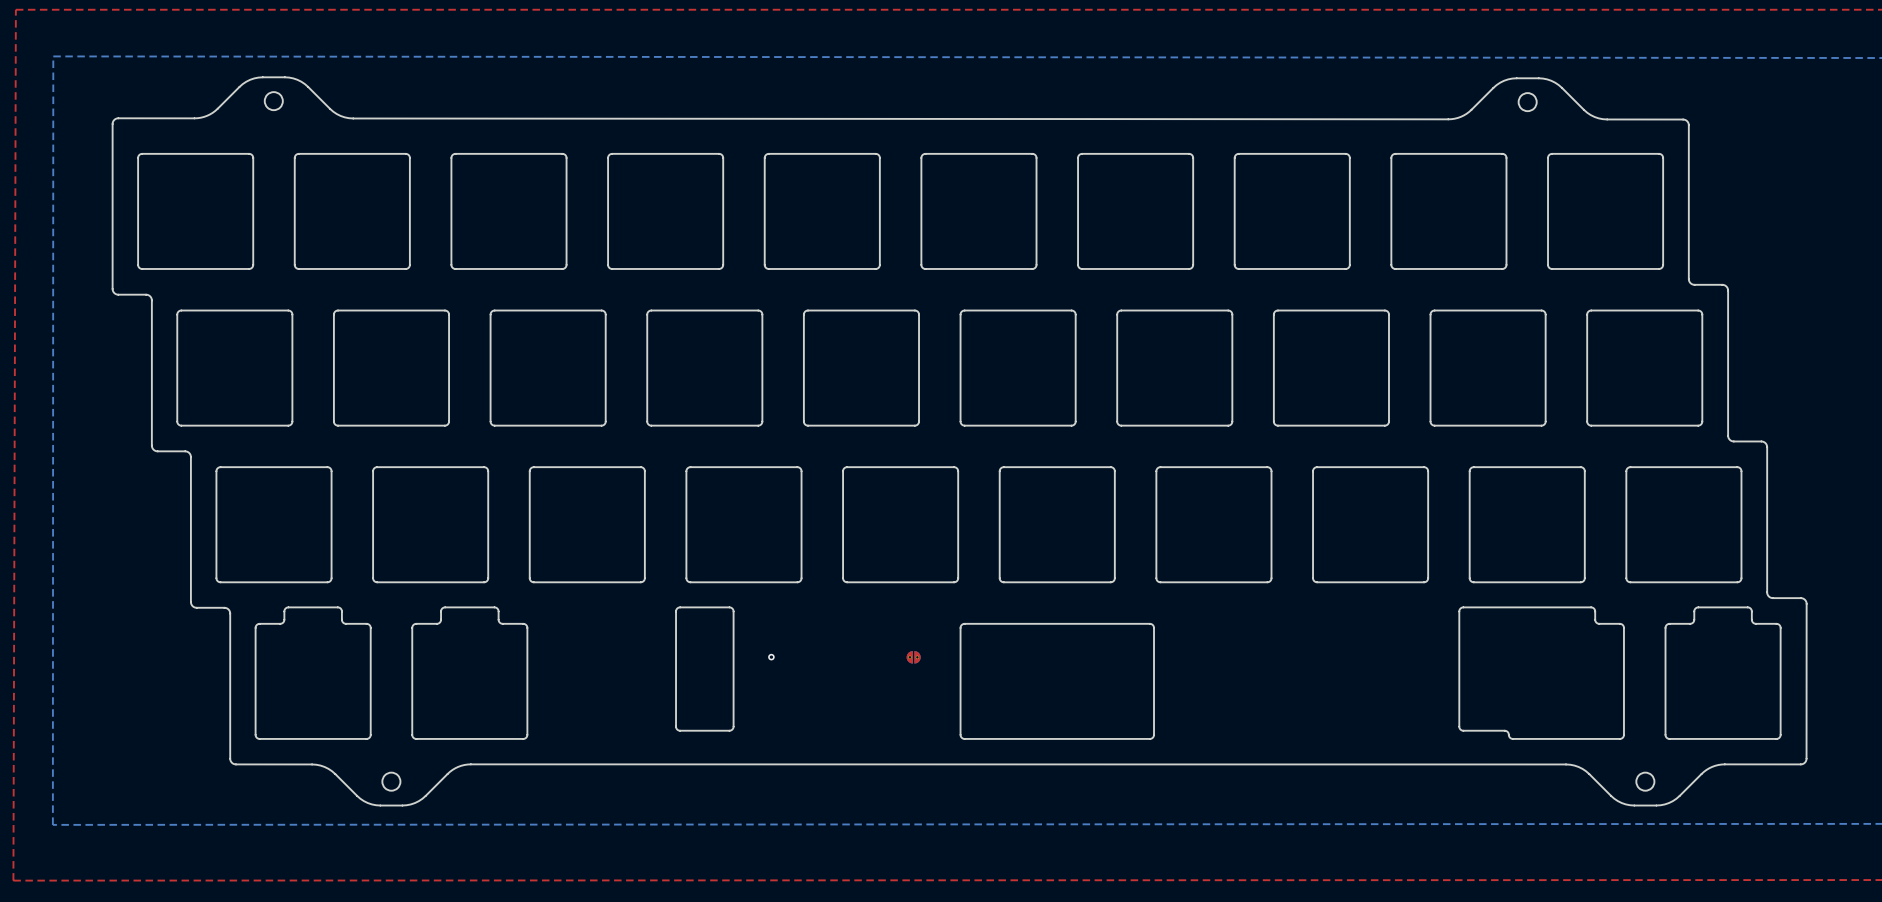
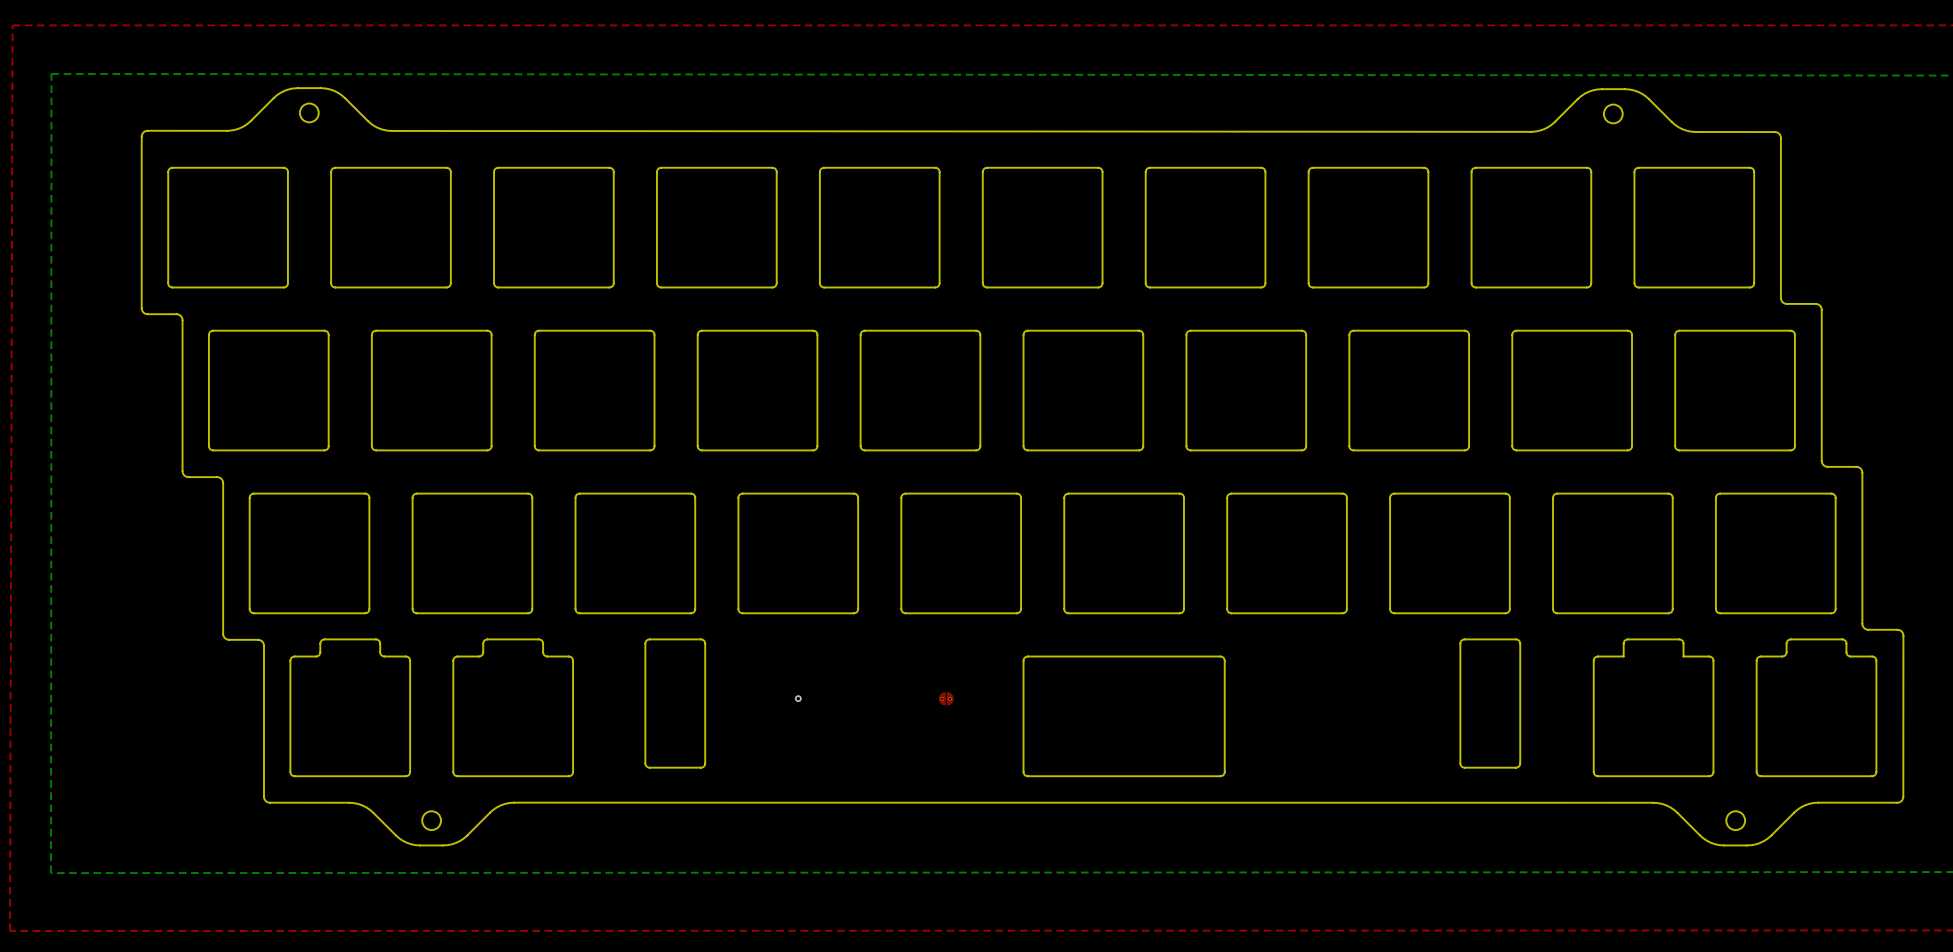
round board edge position: (273, 101) -> (309, 112)
round board edge position: (1527, 102) -> (1613, 113)
board edge: (142, 153) (252, 155) (252, 267) (139, 267) (138, 157) (142, 153) -> (172, 167) (286, 169) (286, 286) (169, 286) (168, 172) (172, 167)
board edge: (298, 153) (408, 155) (408, 267) (295, 267) (294, 157) (298, 153) -> (335, 167) (449, 169) (449, 286) (332, 286) (331, 172) (335, 167)
board edge: (455, 153) (565, 155) (565, 267) (452, 267) (451, 157) (455, 153) -> (498, 167) (612, 169) (612, 286) (495, 286) (494, 172) (498, 167)
board edge: (612, 153) (721, 155) (721, 267) (609, 267) (608, 157) (612, 153) -> (661, 167) (775, 169) (775, 286) (658, 286) (656, 172) (661, 167)
board edge: (768, 153) (878, 155) (878, 267) (765, 267) (764, 157) (768, 153) -> (824, 167) (938, 169) (938, 286) (821, 286) (819, 172) (824, 167)
board edge: (925, 153) (1035, 155) (1035, 267) (922, 267) (921, 157) (925, 153) -> (987, 167) (1101, 169) (1101, 286) (984, 286) (982, 172) (987, 167)
board edge: (1082, 153) (1191, 155) (1191, 267) (1079, 267) (1078, 157) (1082, 153) -> (1149, 167) (1264, 169) (1264, 286) (1146, 286) (1145, 172) (1149, 167)
board edge: (1238, 153) (1348, 155) (1348, 267) (1235, 267) (1234, 157) (1238, 153) -> (1312, 167) (1427, 169) (1427, 286) (1309, 286) (1308, 172) (1312, 167)
board edge: (1395, 153) (1505, 155) (1505, 267) (1392, 267) (1391, 157) (1395, 153) -> (1475, 167) (1590, 169) (1590, 286) (1472, 286) (1471, 172) (1475, 167)
board edge: (1552, 153) (1661, 155) (1661, 267) (1549, 267) (1548, 157) (1552, 153) -> (1638, 167) (1752, 169) (1752, 286) (1635, 286) (1634, 172) (1638, 167)
board edge: (181, 310) (291, 311) (291, 424) (178, 424) (177, 314) (181, 310) -> (213, 330) (327, 331) (327, 449) (210, 449) (208, 334) (213, 330)
board edge: (338, 310) (447, 311) (447, 424) (335, 424) (333, 314) (338, 310) -> (376, 330) (490, 331) (490, 449) (373, 449) (371, 334) (376, 330)
board edge: (494, 310) (604, 311) (604, 424) (491, 424) (490, 314) (494, 310) -> (539, 330) (653, 331) (653, 449) (536, 449) (534, 334) (539, 330)
board edge: (651, 310) (761, 311) (761, 424) (648, 424) (647, 314) (651, 310) -> (701, 330) (816, 331) (816, 449) (698, 449) (697, 334) (701, 330)
board edge: (808, 310) (917, 311) (917, 424) (805, 424) (803, 314) (808, 310) -> (864, 330) (979, 331) (979, 449) (861, 449) (860, 334) (864, 330)
board edge: (964, 310) (1074, 311) (1074, 424) (961, 424) (960, 314) (964, 310) -> (1027, 330) (1142, 331) (1142, 449) (1024, 449) (1023, 334) (1027, 330)
board edge: (1121, 310) (1231, 311) (1231, 424) (1118, 424) (1117, 314) (1121, 310) -> (1190, 330) (1304, 331) (1304, 449) (1187, 449) (1186, 334) (1190, 330)
board edge: (1277, 310) (1387, 311) (1387, 424) (1275, 424) (1273, 314) (1277, 310) -> (1353, 330) (1467, 331) (1467, 449) (1350, 449) (1349, 334) (1353, 330)
board edge: (1434, 310) (1544, 311) (1544, 424) (1431, 424) (1430, 314) (1434, 310) -> (1516, 330) (1630, 331) (1630, 449) (1513, 449) (1512, 334) (1516, 330)
board edge: (1591, 310) (1701, 311) (1701, 424) (1588, 424) (1587, 314) (1591, 310) -> (1679, 330) (1793, 331) (1793, 449) (1676, 449) (1675, 334) (1679, 330)
board edge: (185, 451) (189, 453) (190, 457) (191, 603) (195, 607) (225, 607) (230, 612) (230, 761) (235, 764) (320, 765) (332, 771) (360, 798) (376, 805) (402, 805) (415, 803) (425, 795) (452, 769) (470, 764) (1566, 764) (1574, 765) (1586, 771) (1611, 795) (1621, 803) (1630, 805) (1656, 805) (1669, 803) (1676, 798) (1703, 771) (1715, 765) (1801, 764) (1806, 759) (1806, 602) (1802, 598) (1772, 598) (1767, 594) (1766, 445) (1762, 441) (1732, 441) (1728, 436) (1727, 289) (1723, 284) (1693, 284) (1689, 280) (1688, 123) (1683, 119) (1598, 118) (1587, 112) (1558, 85) (1543, 78) (1516, 78) (1504, 80) (1493, 87) (1466, 113) (1448, 119) (353, 118) (344, 117) (333, 111) (308, 86) (297, 79) (284, 77) (254, 78) (242, 84) (215, 110) (204, 116) (117, 118) (112, 122) (112, 290) (116, 294) (146, 294) (151, 298) (152, 447) (156, 451) (185, 451) -> (297, 88) (284, 90) (277, 95) (248, 123) (236, 129) (147, 130) (143, 133) (141, 136) (141, 309) (146, 314) (177, 314) (182, 318) (182, 471) (186, 476) (217, 477) (222, 481) (223, 634) (227, 639) (258, 639) (263, 644) (264, 796) (267, 802) (357, 803) (369, 809) (403, 840) (420, 845) (447, 845) (456, 842) (467, 835) (495, 808) (514, 802) (1653, 802) (1662, 803) (1674, 809) (1700, 835) (1711, 842) (1719, 845) (1747, 845) (1760, 842) (1768, 838) (1796, 810) (1808, 804) (1897, 802) (1902, 799) (1903, 634) (1898, 629) (1867, 629) (1862, 625) (1862, 472) (1857, 467) (1826, 466) (1821, 462) (1821, 307) (1816, 304) (1785, 303) (1781, 299) (1780, 138) (1777, 132) (1687, 130) (1675, 124) (1645, 96) (1637, 91) (1624, 89) (1597, 89) (1588, 91) (1577, 99) (1549, 126) (1530, 131) (391, 130) (383, 129) (371, 123) (345, 98) (333, 90) (325, 88) (297, 88)
board edge: (220, 467) (330, 468) (330, 581) (217, 581) (216, 471) (220, 467) -> (253, 493) (368, 494) (368, 612) (250, 612) (249, 497) (253, 493)
board edge: (377, 467) (487, 468) (487, 581) (374, 581) (373, 471) (377, 467) -> (416, 493) (531, 494) (531, 612) (413, 612) (412, 497) (416, 493)
board edge: (533, 467) (643, 468) (643, 581) (530, 581) (529, 471) (533, 467) -> (579, 493) (693, 494) (693, 612) (576, 612) (575, 497) (579, 493)
board edge: (690, 467) (800, 468) (800, 581) (687, 581) (686, 471) (690, 467) -> (742, 493) (856, 494) (856, 612) (739, 612) (738, 497) (742, 493)
board edge: (847, 467) (956, 468) (956, 581) (844, 581) (843, 471) (847, 467) -> (905, 493) (1019, 494) (1019, 612) (902, 612) (901, 497) (905, 493)
board edge: (1003, 467) (1113, 468) (1113, 581) (1000, 581) (999, 471) (1003, 467) -> (1068, 493) (1182, 494) (1182, 612) (1065, 612) (1064, 497) (1068, 493)
board edge: (1160, 467) (1270, 468) (1270, 581) (1157, 581) (1156, 471) (1160, 467) -> (1231, 493) (1345, 494) (1345, 612) (1228, 612) (1227, 497) (1231, 493)
board edge: (1317, 467) (1426, 468) (1426, 581) (1314, 581) (1313, 471) (1317, 467) -> (1394, 493) (1508, 494) (1508, 612) (1391, 612) (1390, 497) (1394, 493)
board edge: (1473, 467) (1583, 468) (1583, 581) (1470, 581) (1469, 471) (1473, 467) -> (1557, 493) (1671, 494) (1671, 612) (1554, 612) (1553, 497) (1557, 493)
board edge: (1630, 467) (1740, 468) (1740, 581) (1627, 581) (1626, 471) (1630, 467) -> (1720, 493) (1834, 494) (1834, 612) (1717, 612) (1715, 497) (1720, 493)
board edge: none -> (324, 639) (377, 639) (380, 642) (380, 652) (382, 655) (406, 656) (409, 658) (410, 771) (407, 775) (294, 776) (290, 774) (290, 659) (294, 656) (318, 655) (320, 652) (320, 642) (324, 639)
board edge: none -> (487, 639) (539, 639) (542, 642) (543, 652) (545, 655) (569, 656) (572, 658) (573, 771) (570, 775) (457, 776) (453, 774) (453, 659) (457, 656) (481, 655) (483, 652) (483, 642) (487, 639)
board edge: none -> (1464, 639) (1515, 639) (1519, 642) (1520, 763) (1517, 767) (1464, 767) (1460, 765) (1460, 643) (1464, 639)
board edge: none -> (1627, 639) (1680, 639) (1683, 643) (1683, 656) (1709, 656) (1712, 658) (1713, 771) (1711, 775) (1598, 776) (1594, 774) (1593, 659) (1597, 656) (1623, 656) (1623, 642) (1627, 639)
board edge: none -> (1790, 639) (1843, 639) (1846, 642) (1846, 652) (1848, 655) (1872, 656) (1875, 658) (1876, 771) (1874, 775) (1760, 776) (1757, 774) (1756, 659) (1760, 656) (1784, 655) (1786, 652) (1786, 642) (1790, 639)
board edge: (680, 607) (729, 607) (733, 609) (733, 726) (731, 730) (680, 730) (676, 728) (676, 611) (680, 607) -> (649, 639) (700, 639) (704, 642) (705, 763) (702, 767) (649, 767) (645, 765) (645, 643) (649, 639)
board edge: (284, 611) (287, 607) (338, 607) (341, 609) (344, 623) (366, 623) -> none
board edge: (284, 611) (282, 623) (259, 623) (255, 626) (255, 734) (258, 738) (369, 737) (370, 627) (366, 623) -> none
board edge: none -> (1027, 656) (1222, 657) (1224, 660) (1224, 774) (1220, 776) (1025, 775) (1023, 771) (1023, 660) (1027, 656)
board edge: (1694, 619) (1694, 610) (1697, 607) (1747, 607) (1751, 609) (1753, 623) (1776, 623) -> none
board edge: (1694, 619) (1691, 623) (1669, 623) (1665, 626) (1665, 734) (1668, 738) (1779, 737) (1780, 627) (1776, 623) -> none
board edge: (502, 623) (498, 621) (498, 610) (495, 607) (445, 607) (441, 609) (438, 623) (413, 625) (412, 734) (416, 738) -> none
board edge: (502, 623) (523, 623) (527, 626) (526, 737) (523, 738) (416, 738) -> none
board edge: (1149, 623) (1154, 627) (1154, 734) -> none
board edge: (1149, 623) (962, 624) (960, 627) (960, 734) (964, 738) (1149, 738) (1154, 734) -> none
board edge: (1512, 738) (1505, 730) (1463, 730) (1459, 728) (1460, 608) (1591, 607) (1594, 609) (1597, 623) (1622, 625) (1622, 737) (1512, 738) -> none
round board edge position: (391, 781) -> (431, 820)
round board edge position: (1645, 781) -> (1735, 820)

